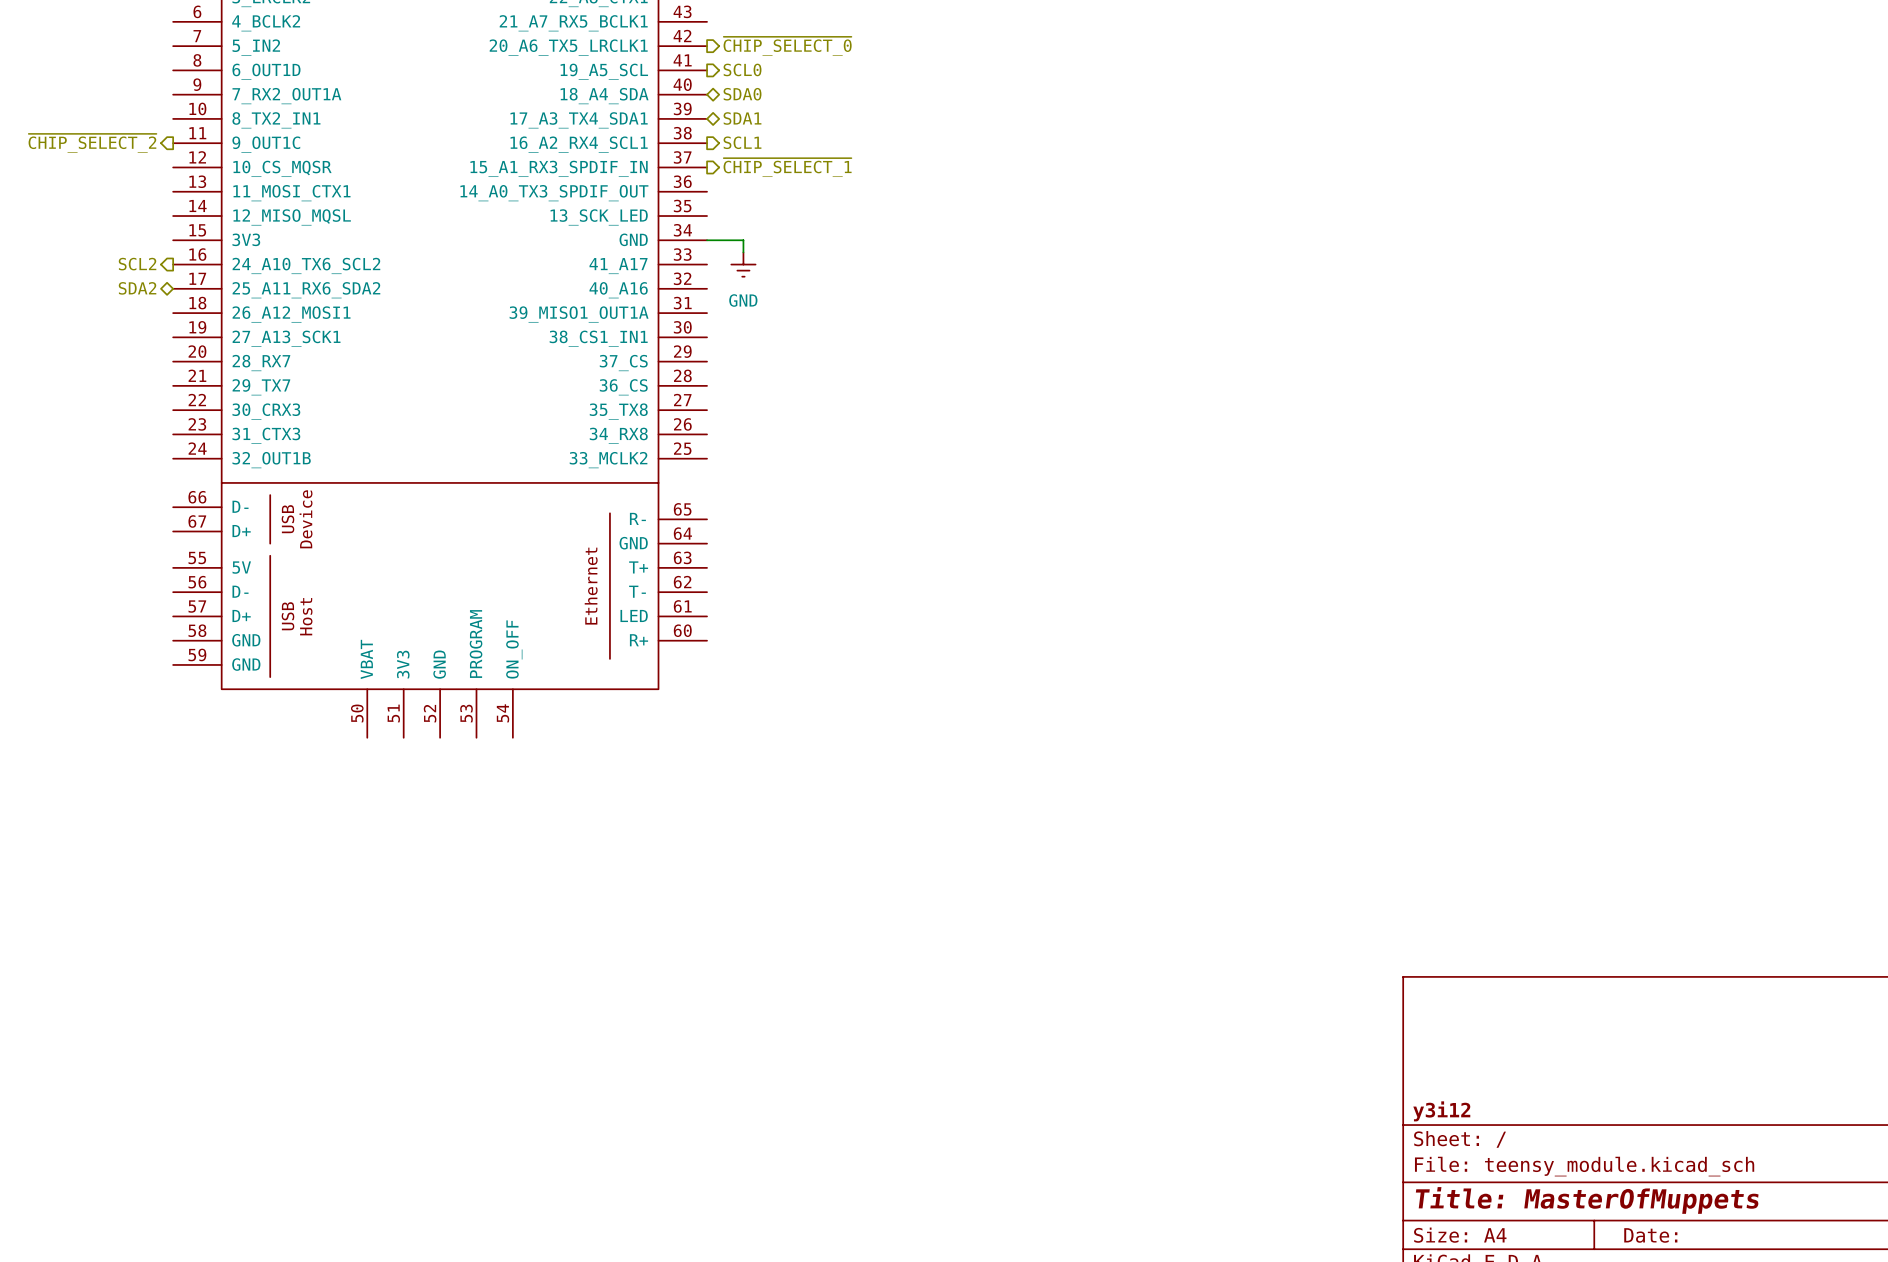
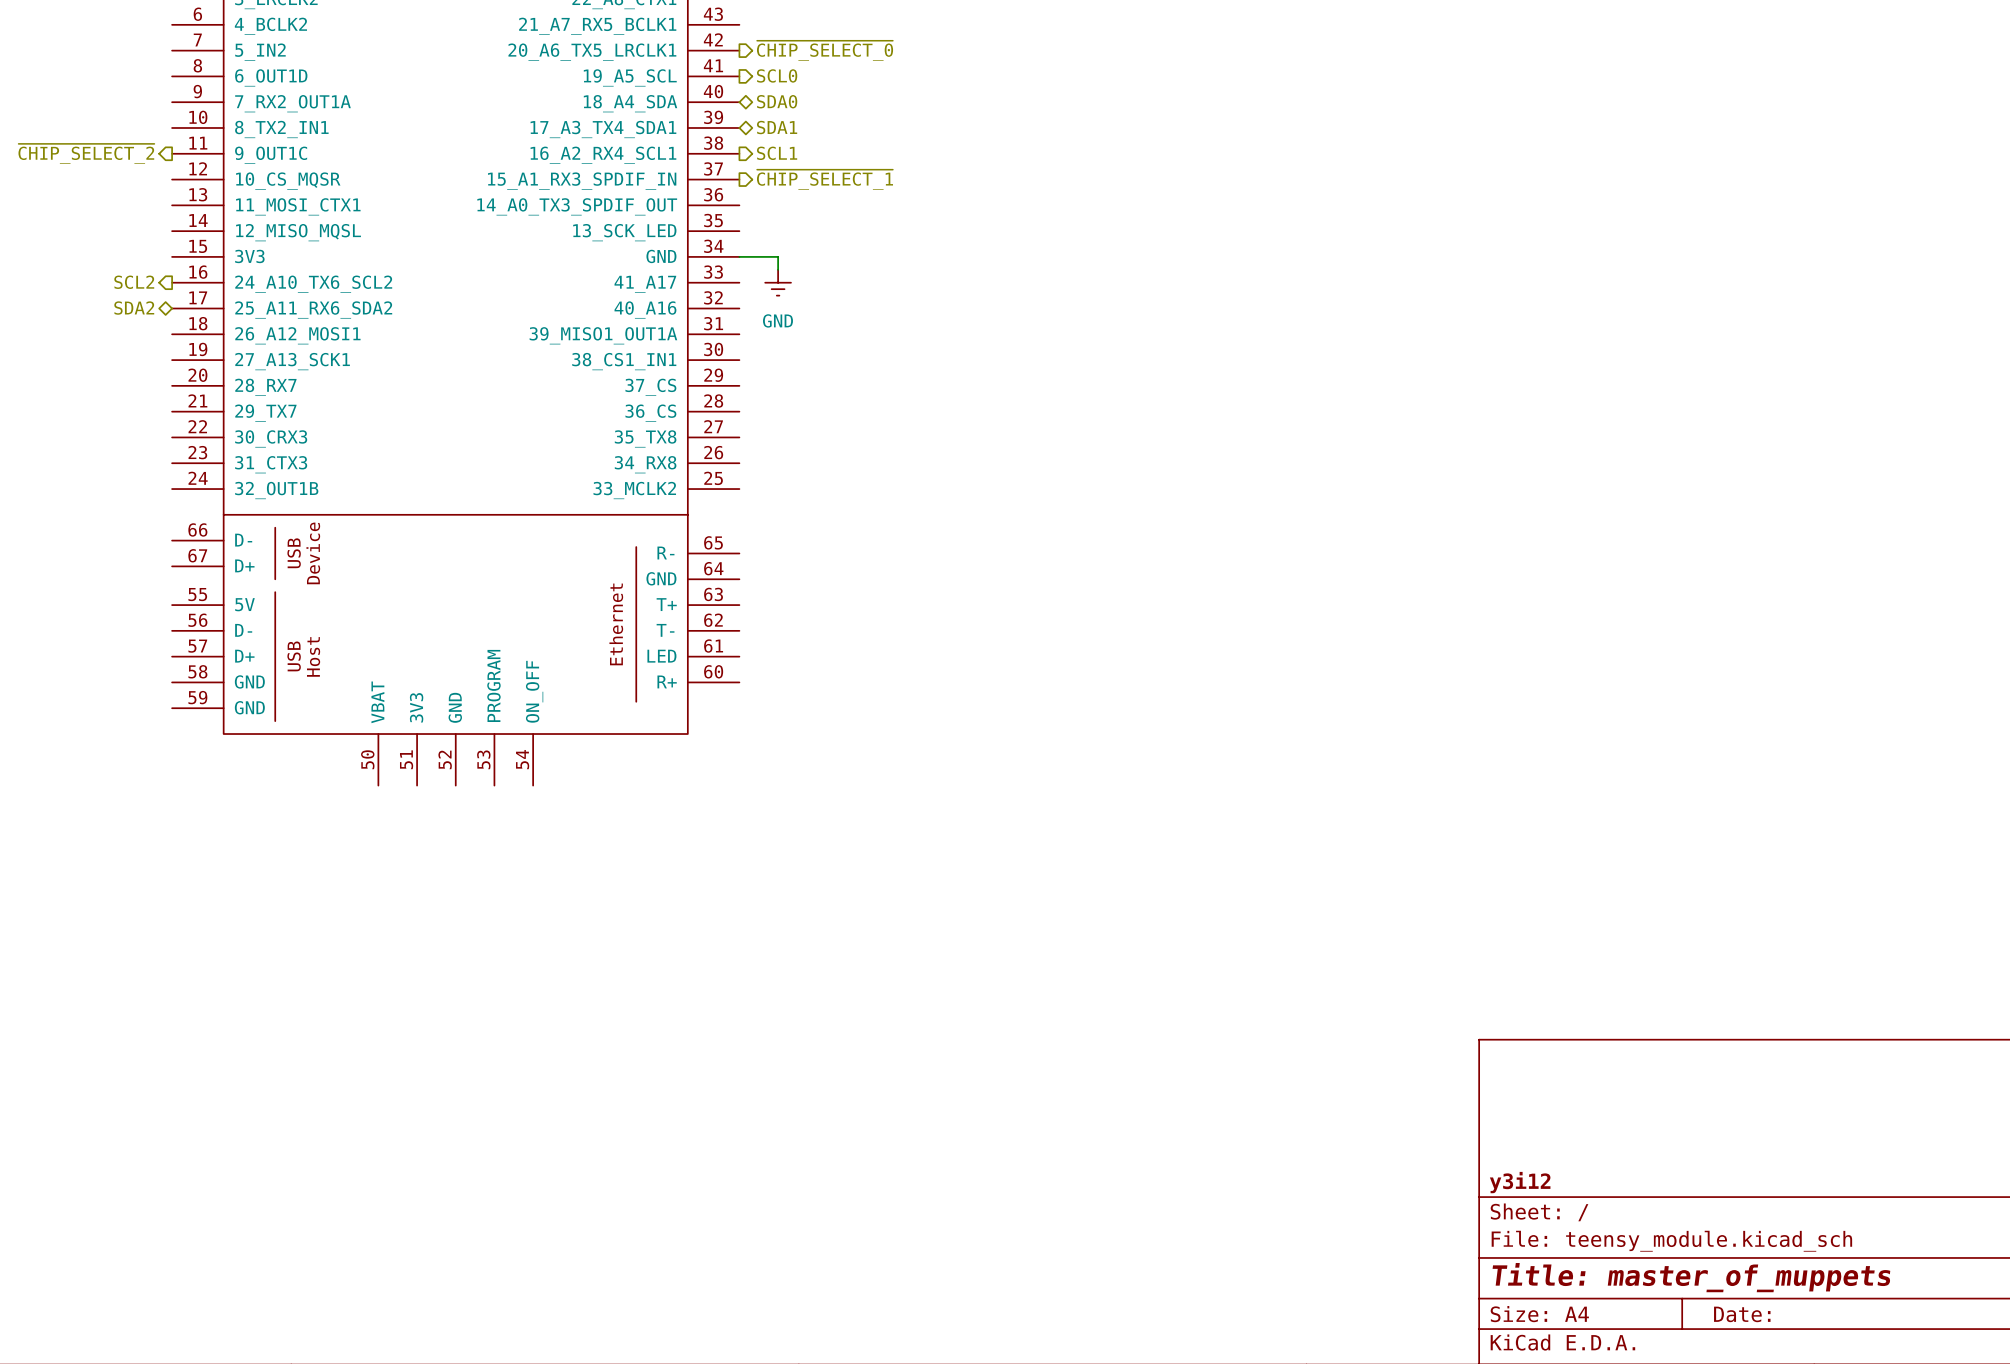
title block: Title: MasterOfMuppets (1587, 1200) -> Title: master_of_muppets (1691, 1277)

